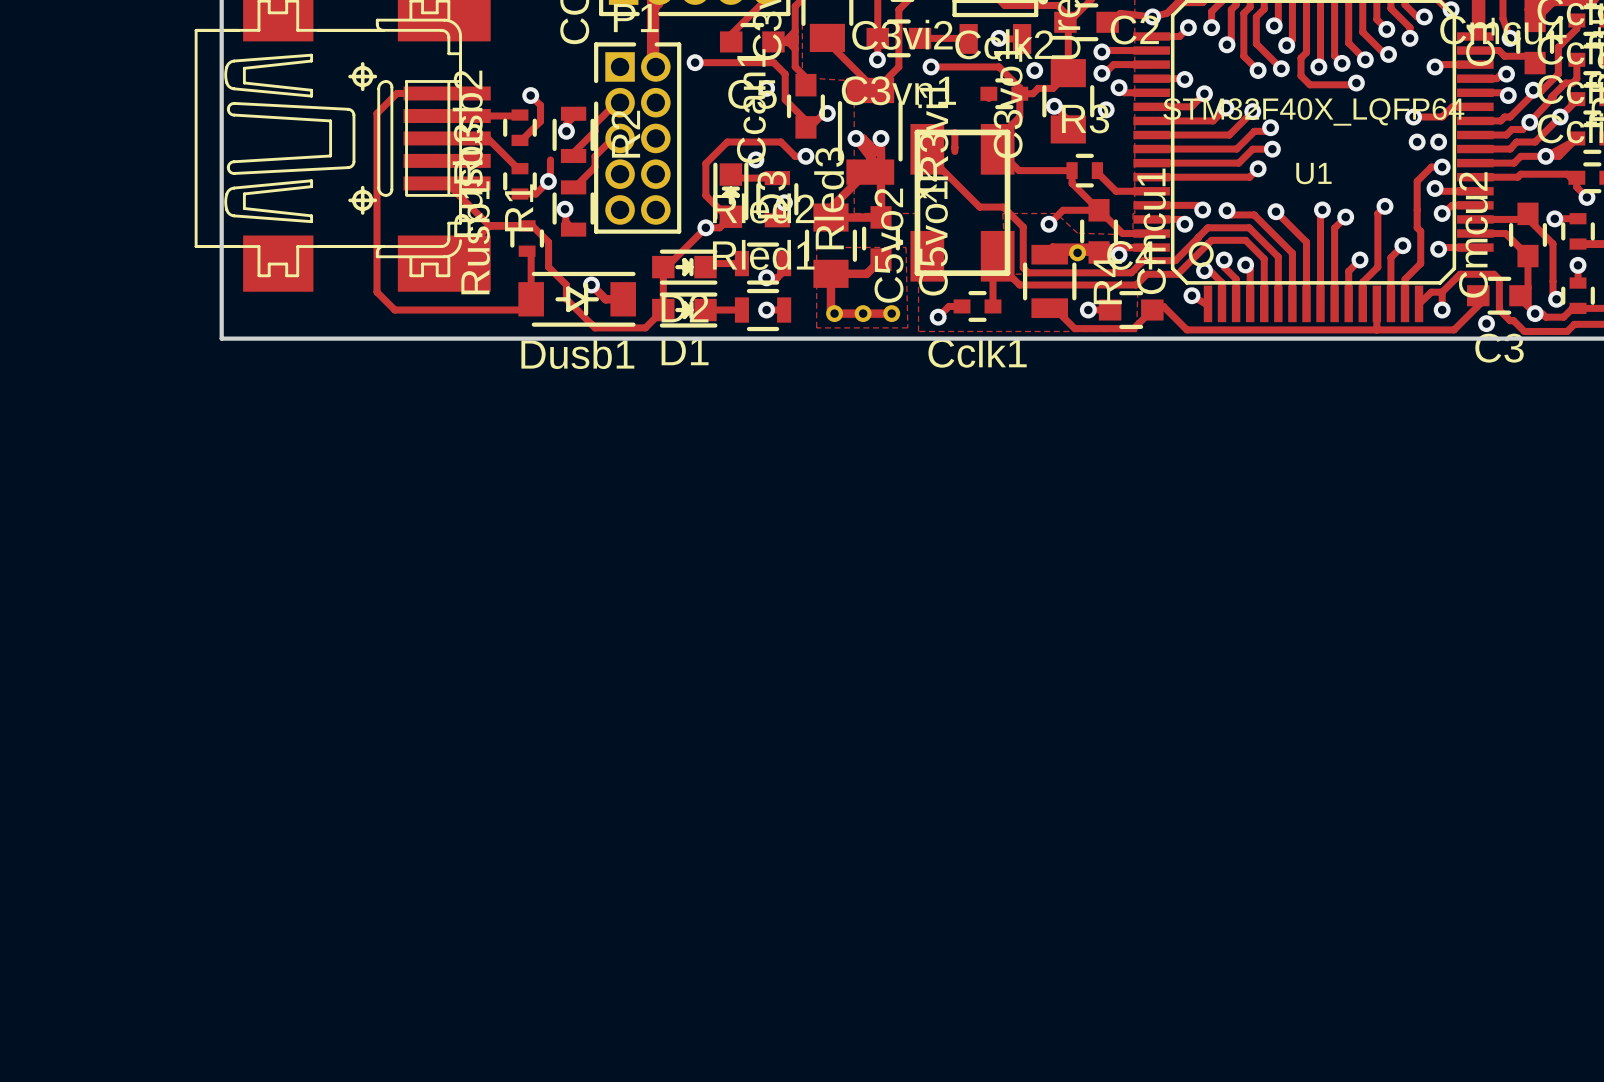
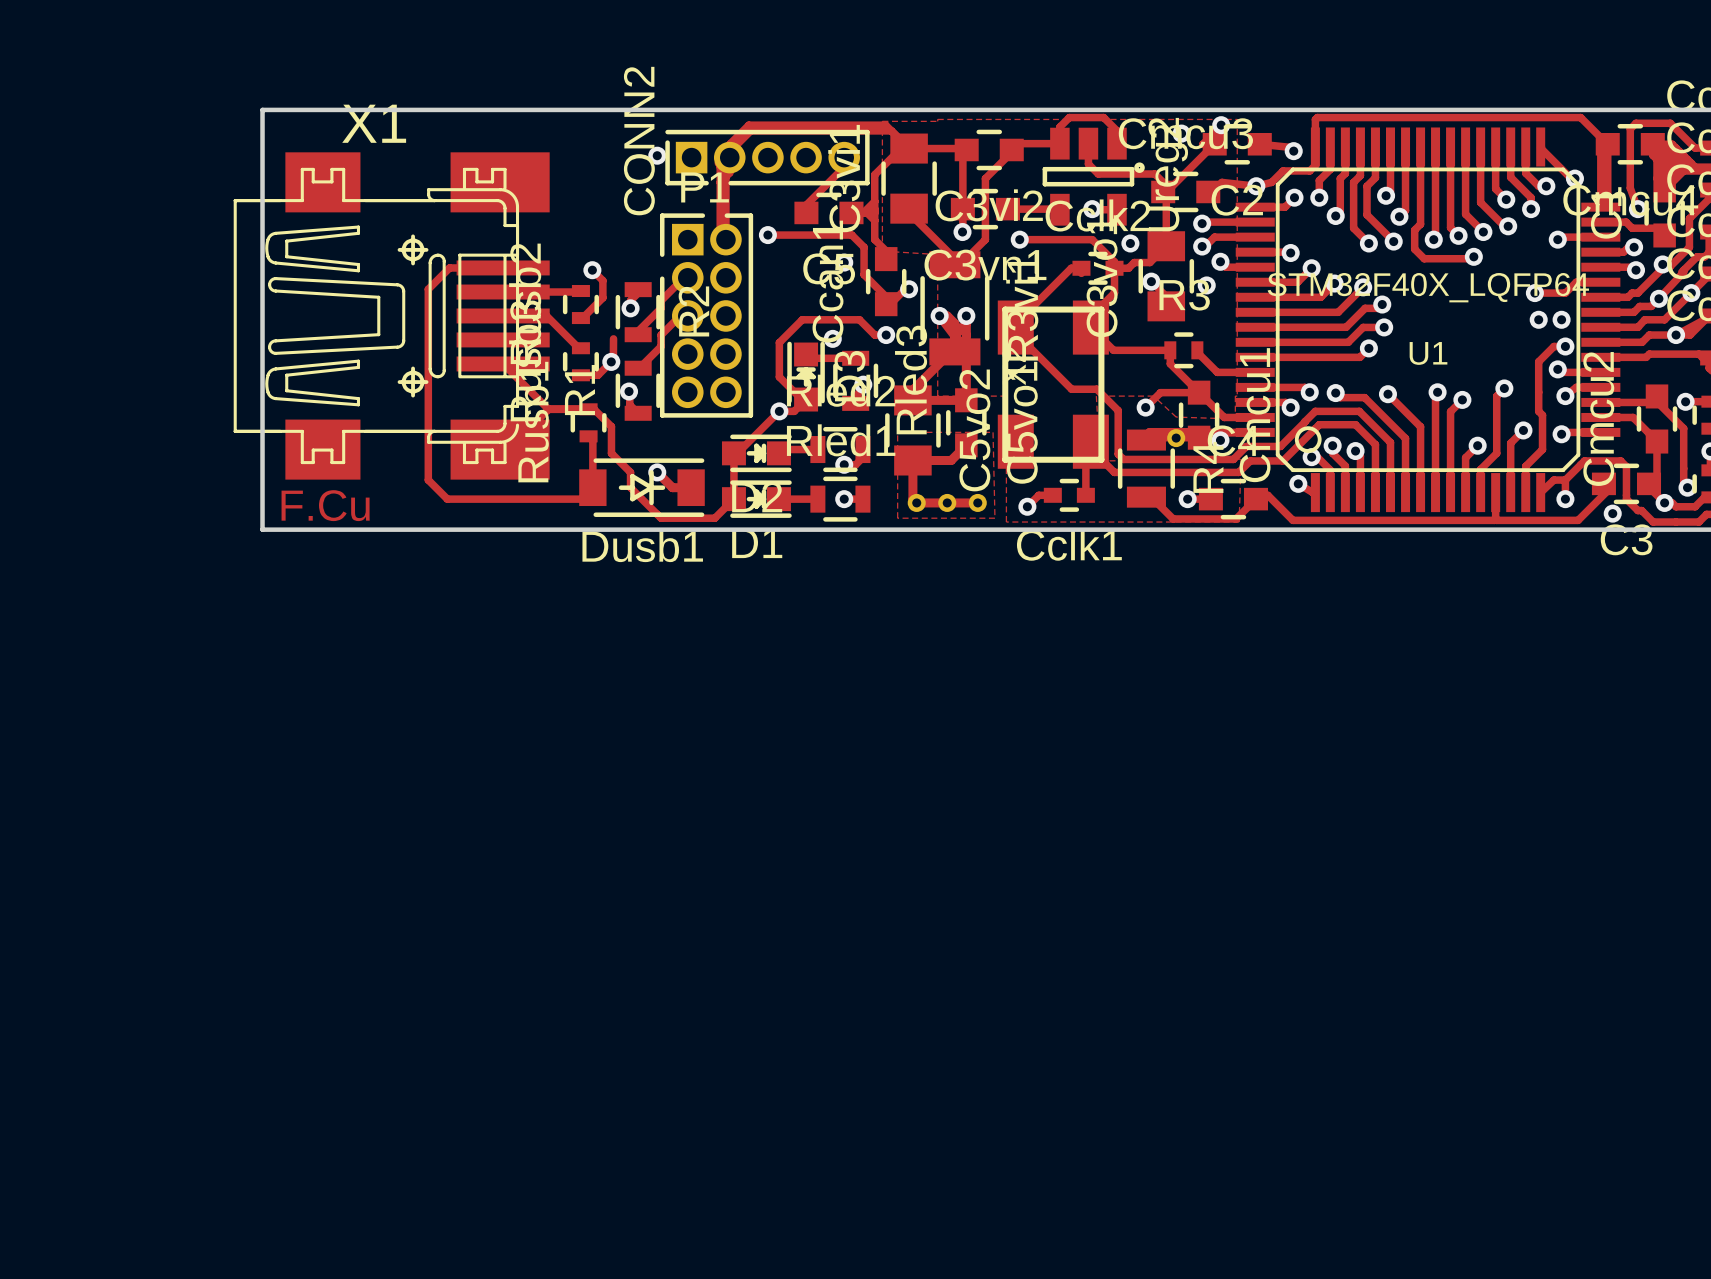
track: none -> (1081, 268) (1071, 268) (1015, 323) (1015, 327)
track: (954, 132) (954, 151) -> none
text: none -> F.Cu (325, 505)

